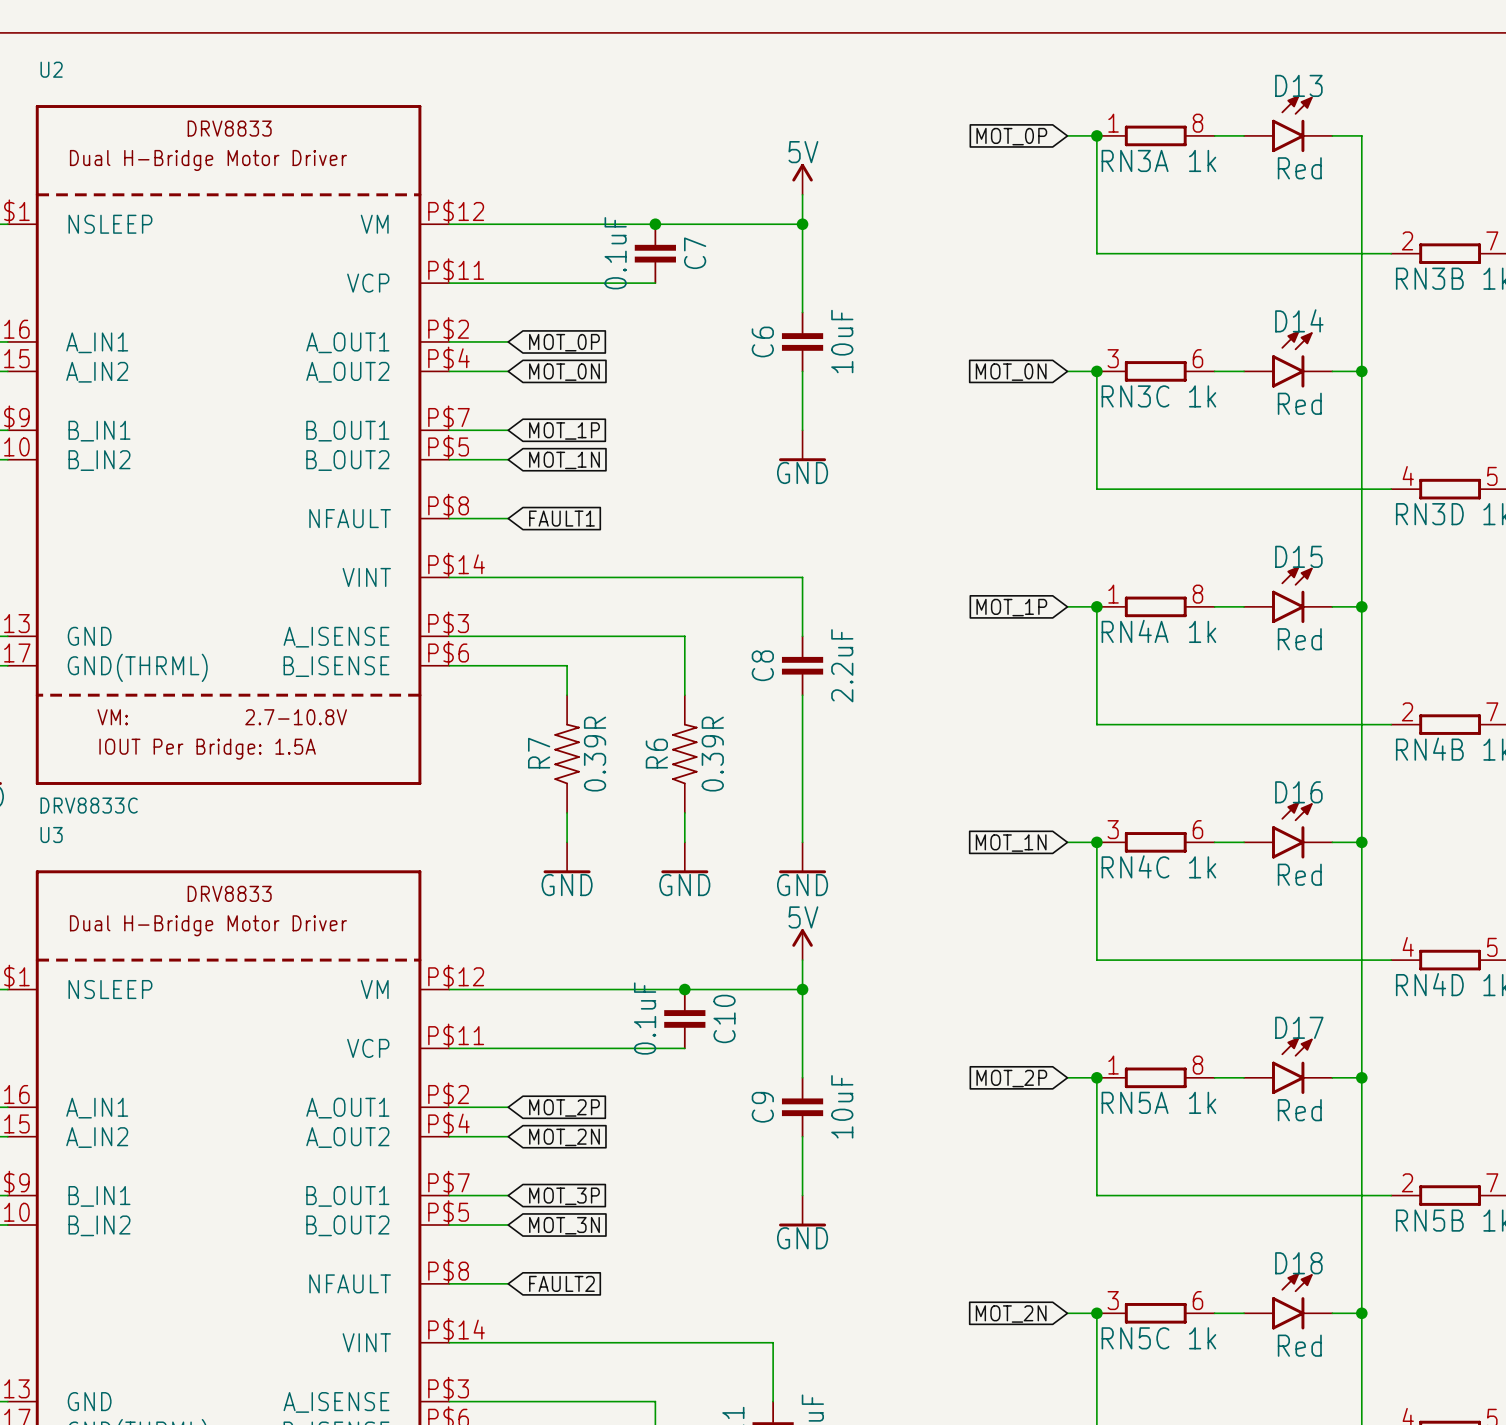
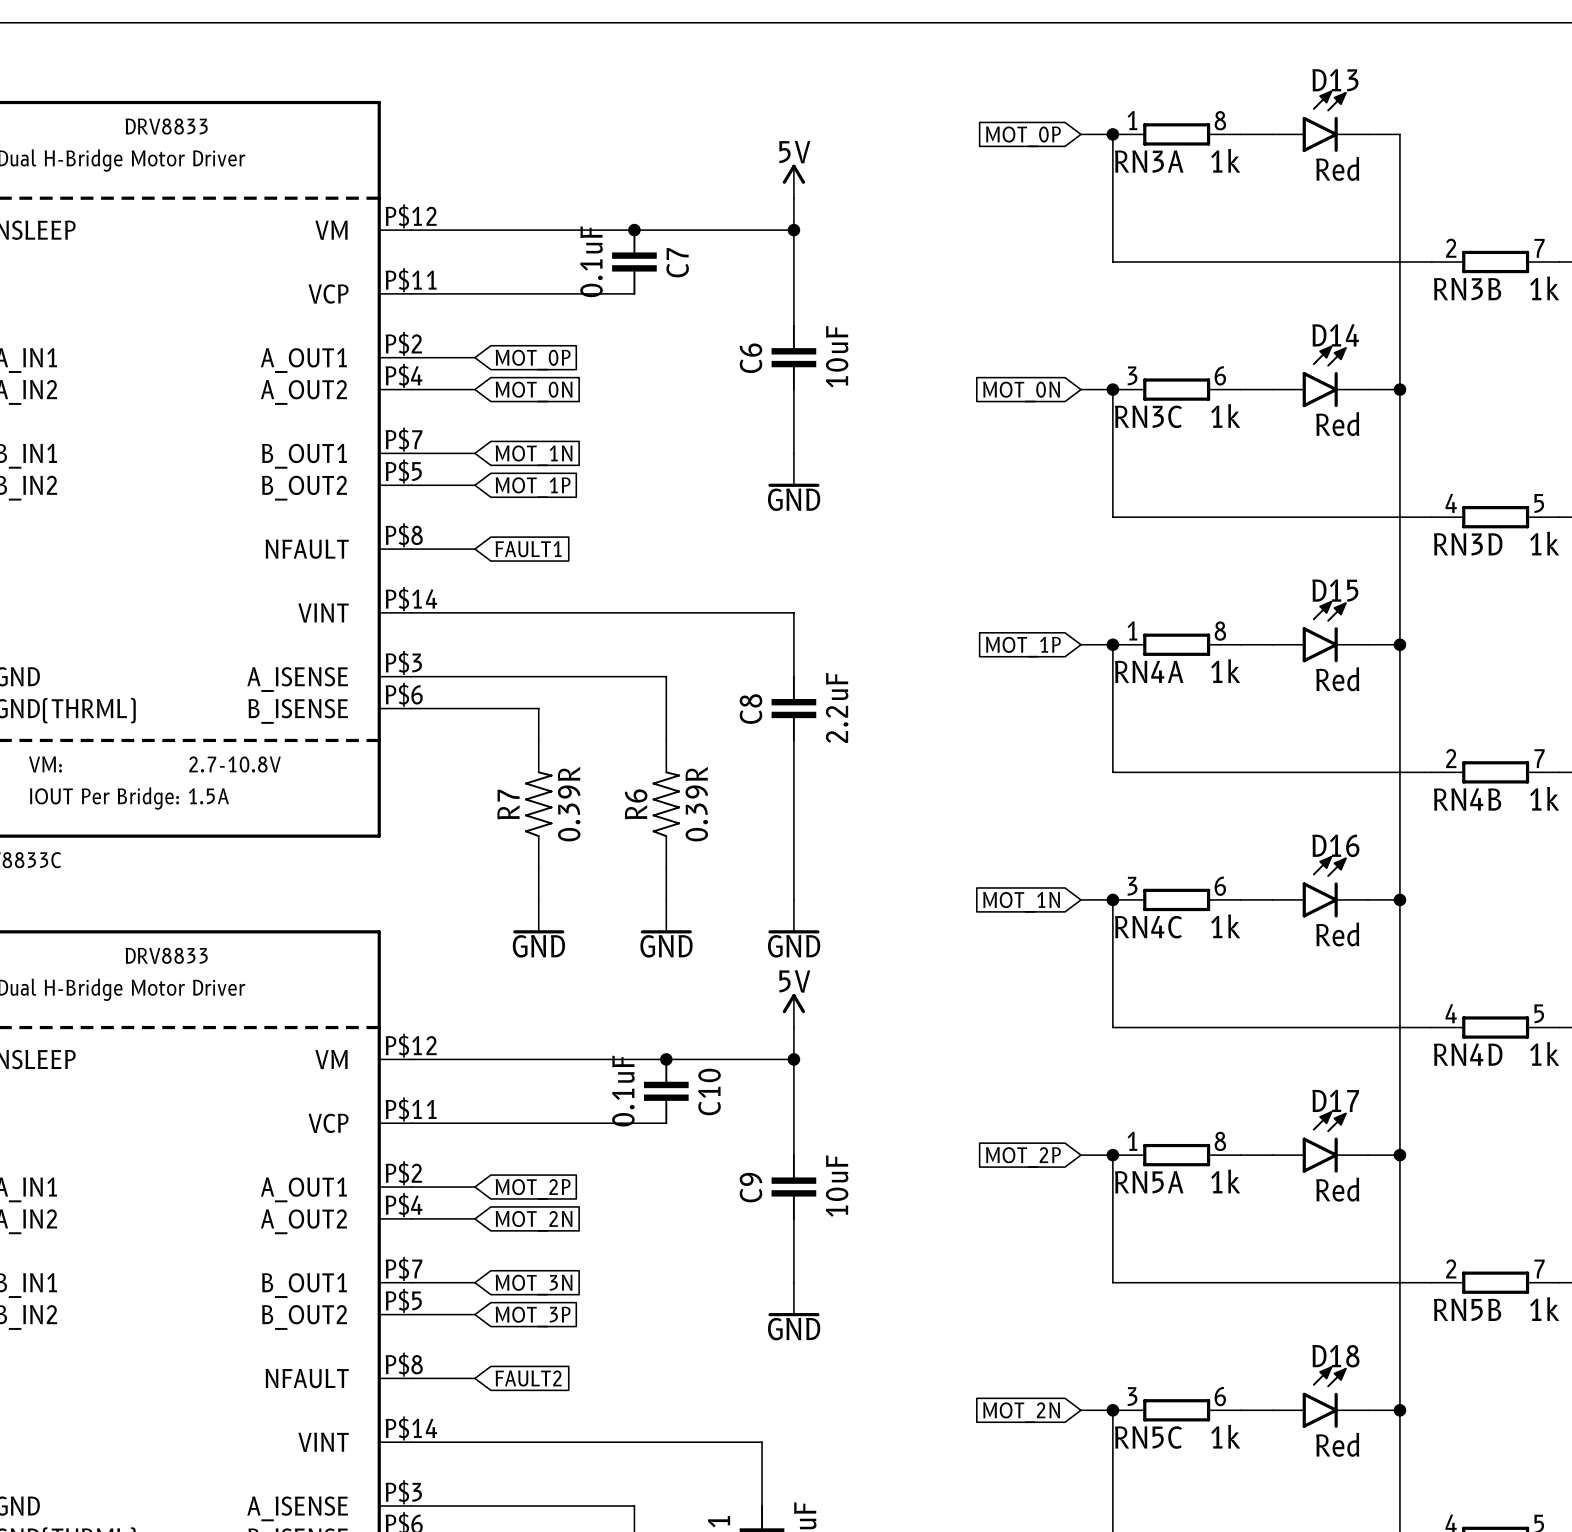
global label: MOT_1P (564, 430) -> MOT_1N (534, 455)
global label: MOT_1N (564, 460) -> MOT_1P (533, 487)
global label: MOT_3P (564, 1196) -> MOT_3N (534, 1285)
global label: MOT_3N (564, 1225) -> MOT_3P (533, 1316)

